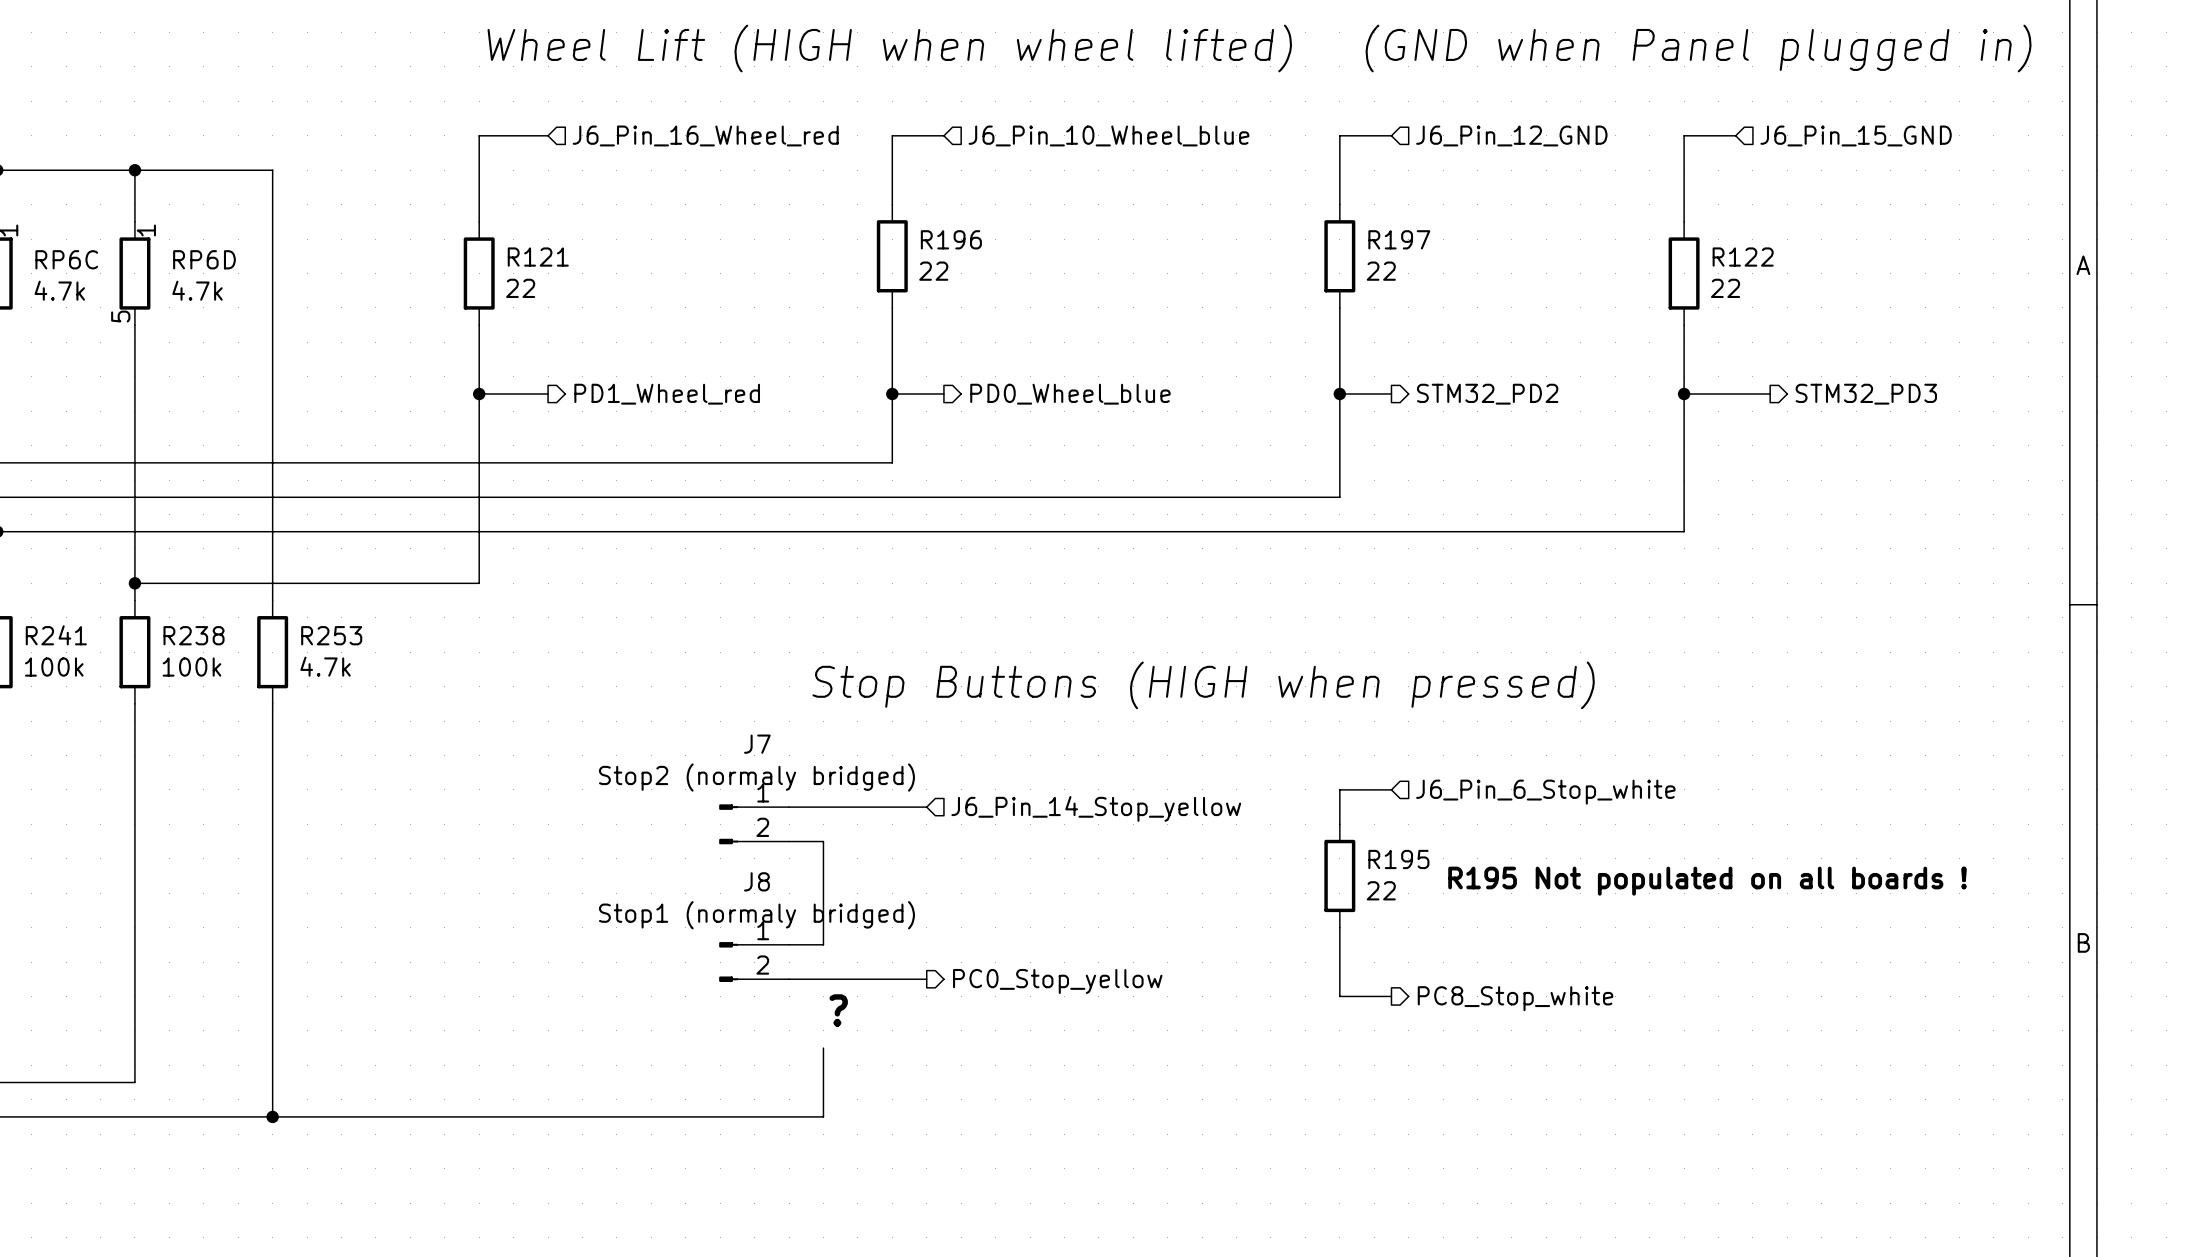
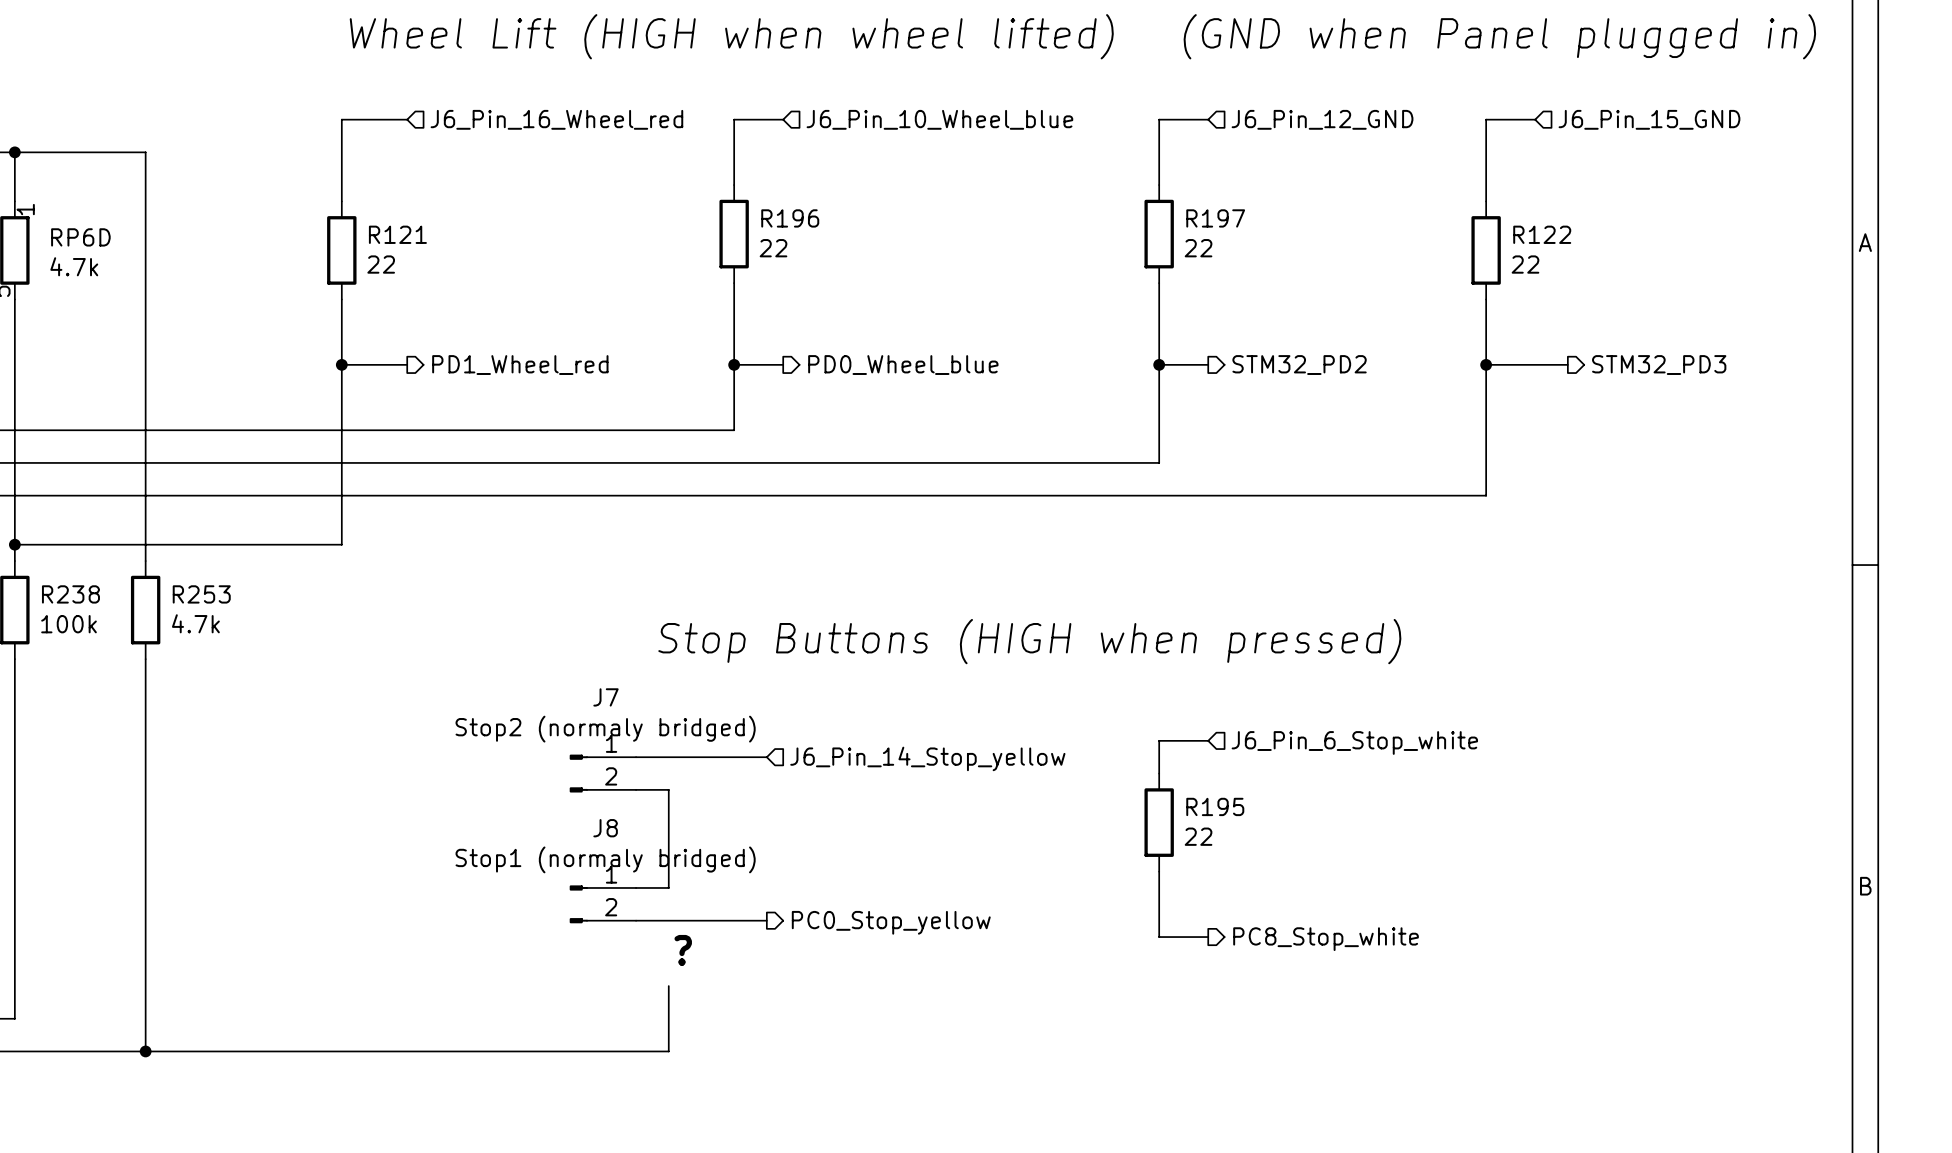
text: R195 Not populated on all boards ! (1707, 881) -> none

